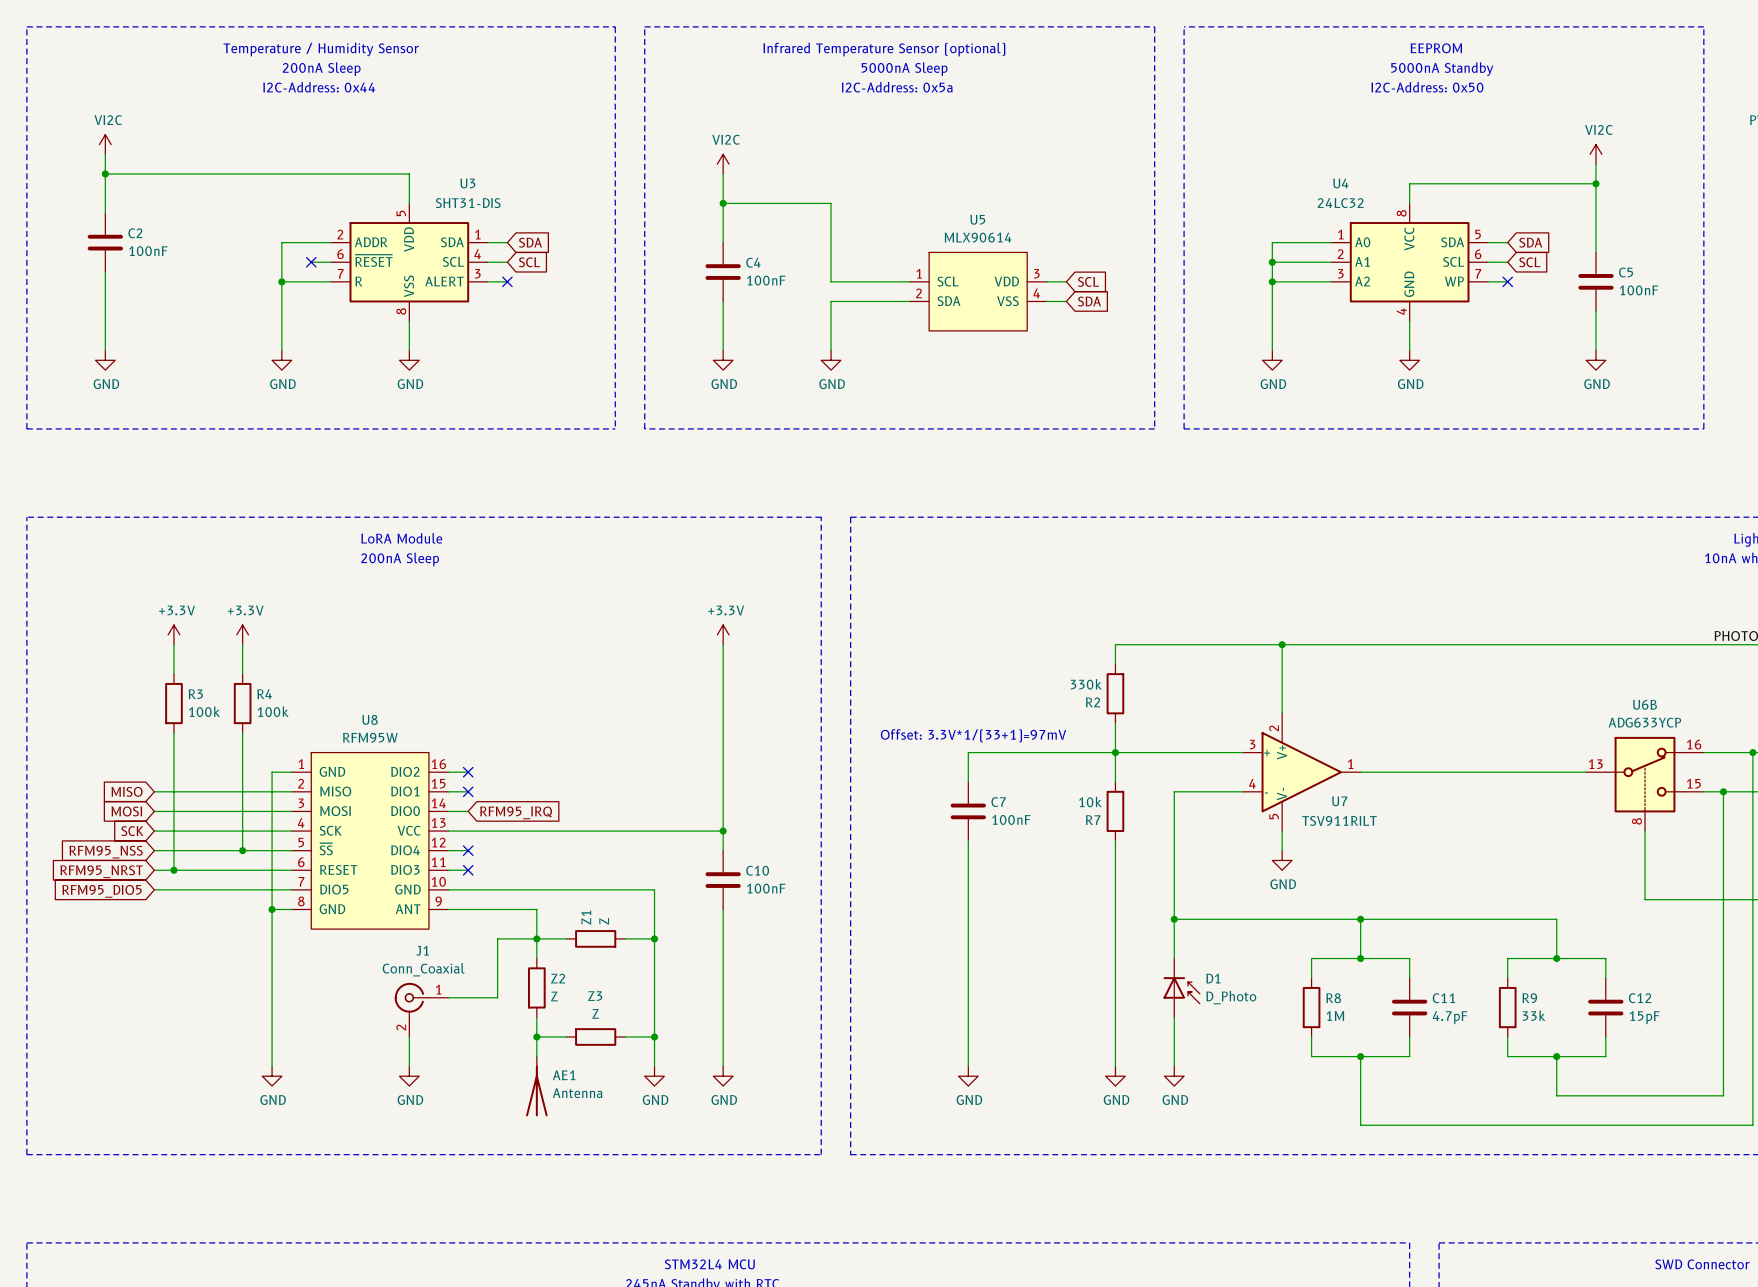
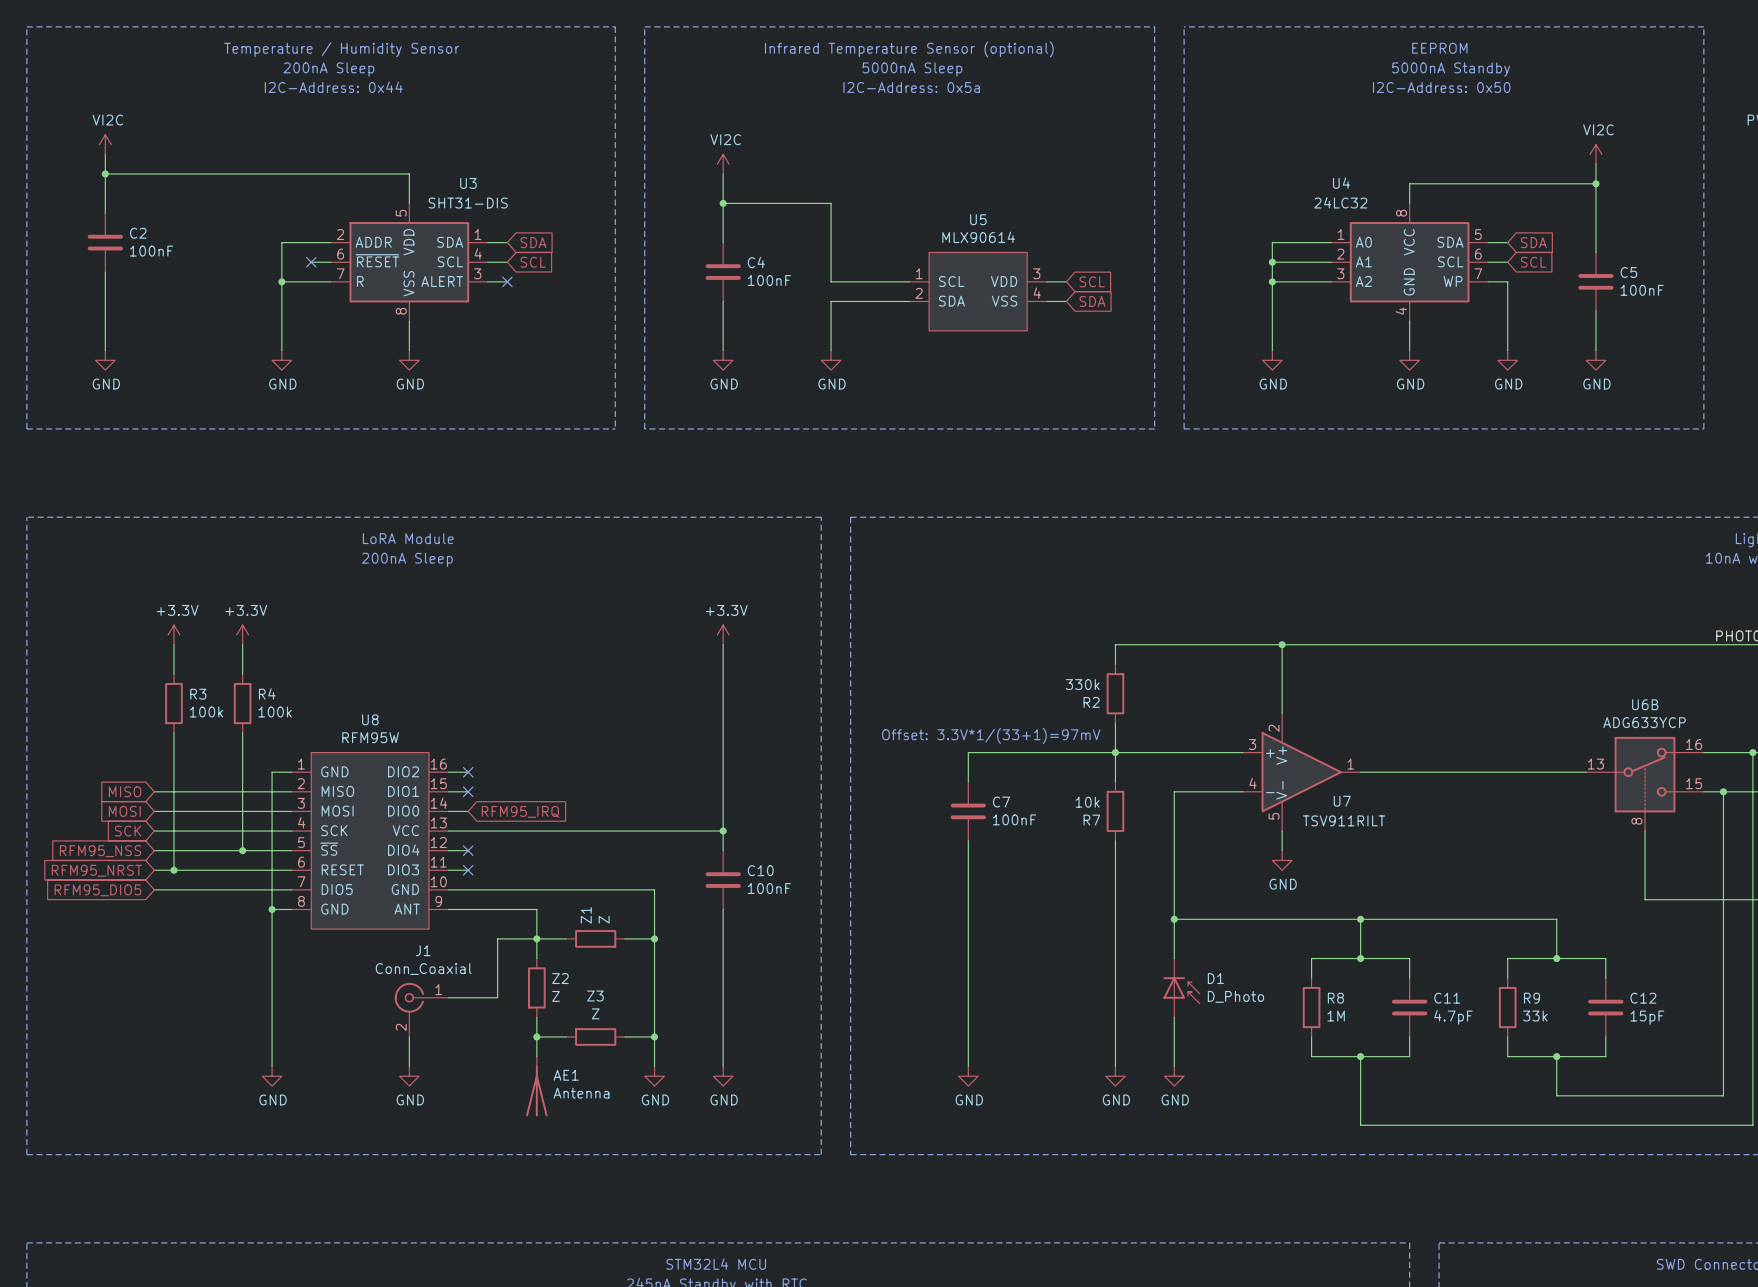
wire: none -> (1507, 281) (1507, 350)
no-connect mark: (1507, 281) -> none
power symbol: none -> GND (1507, 360)

